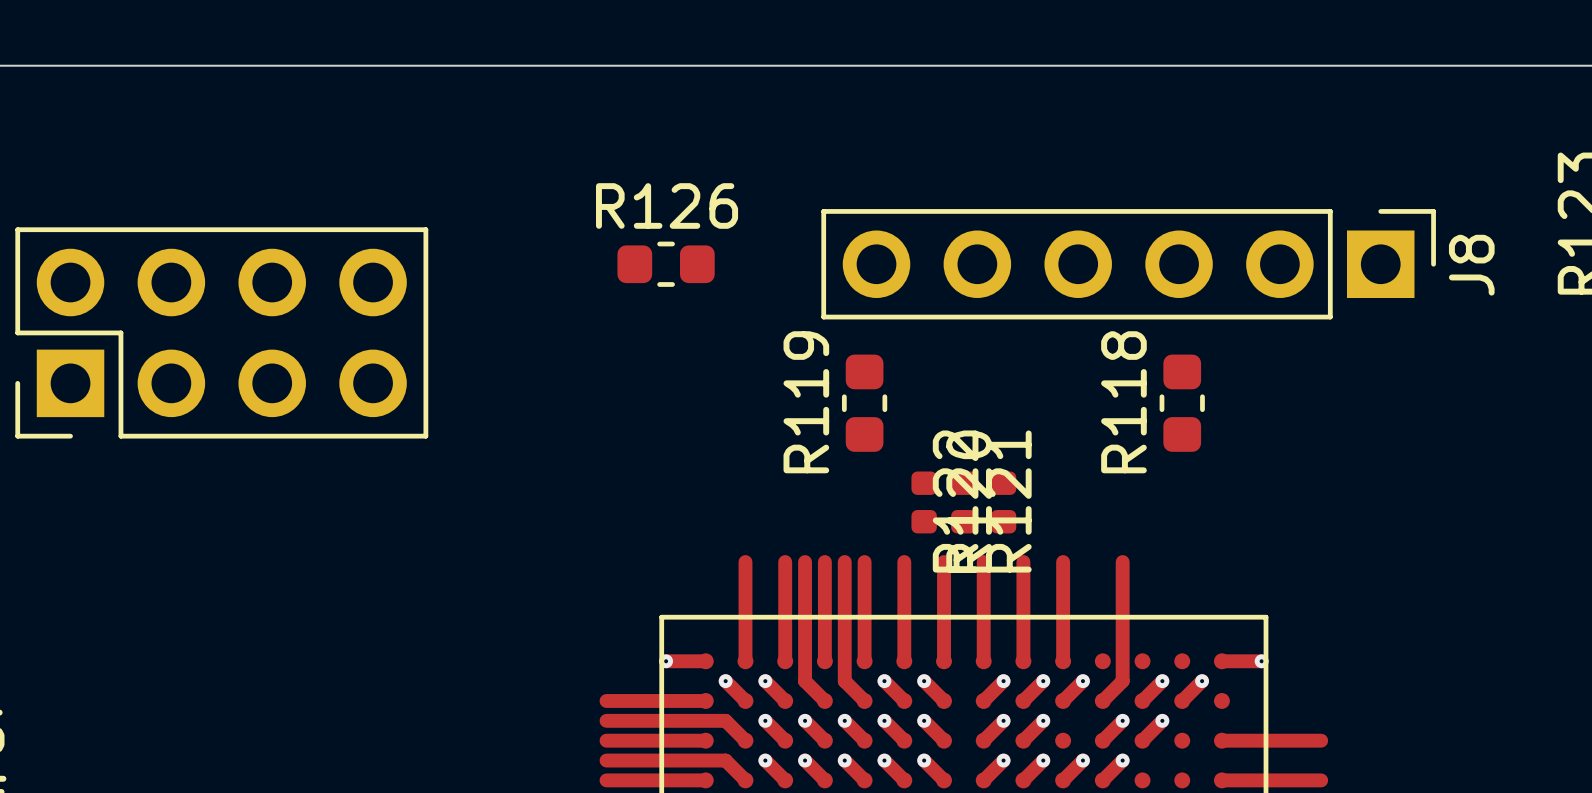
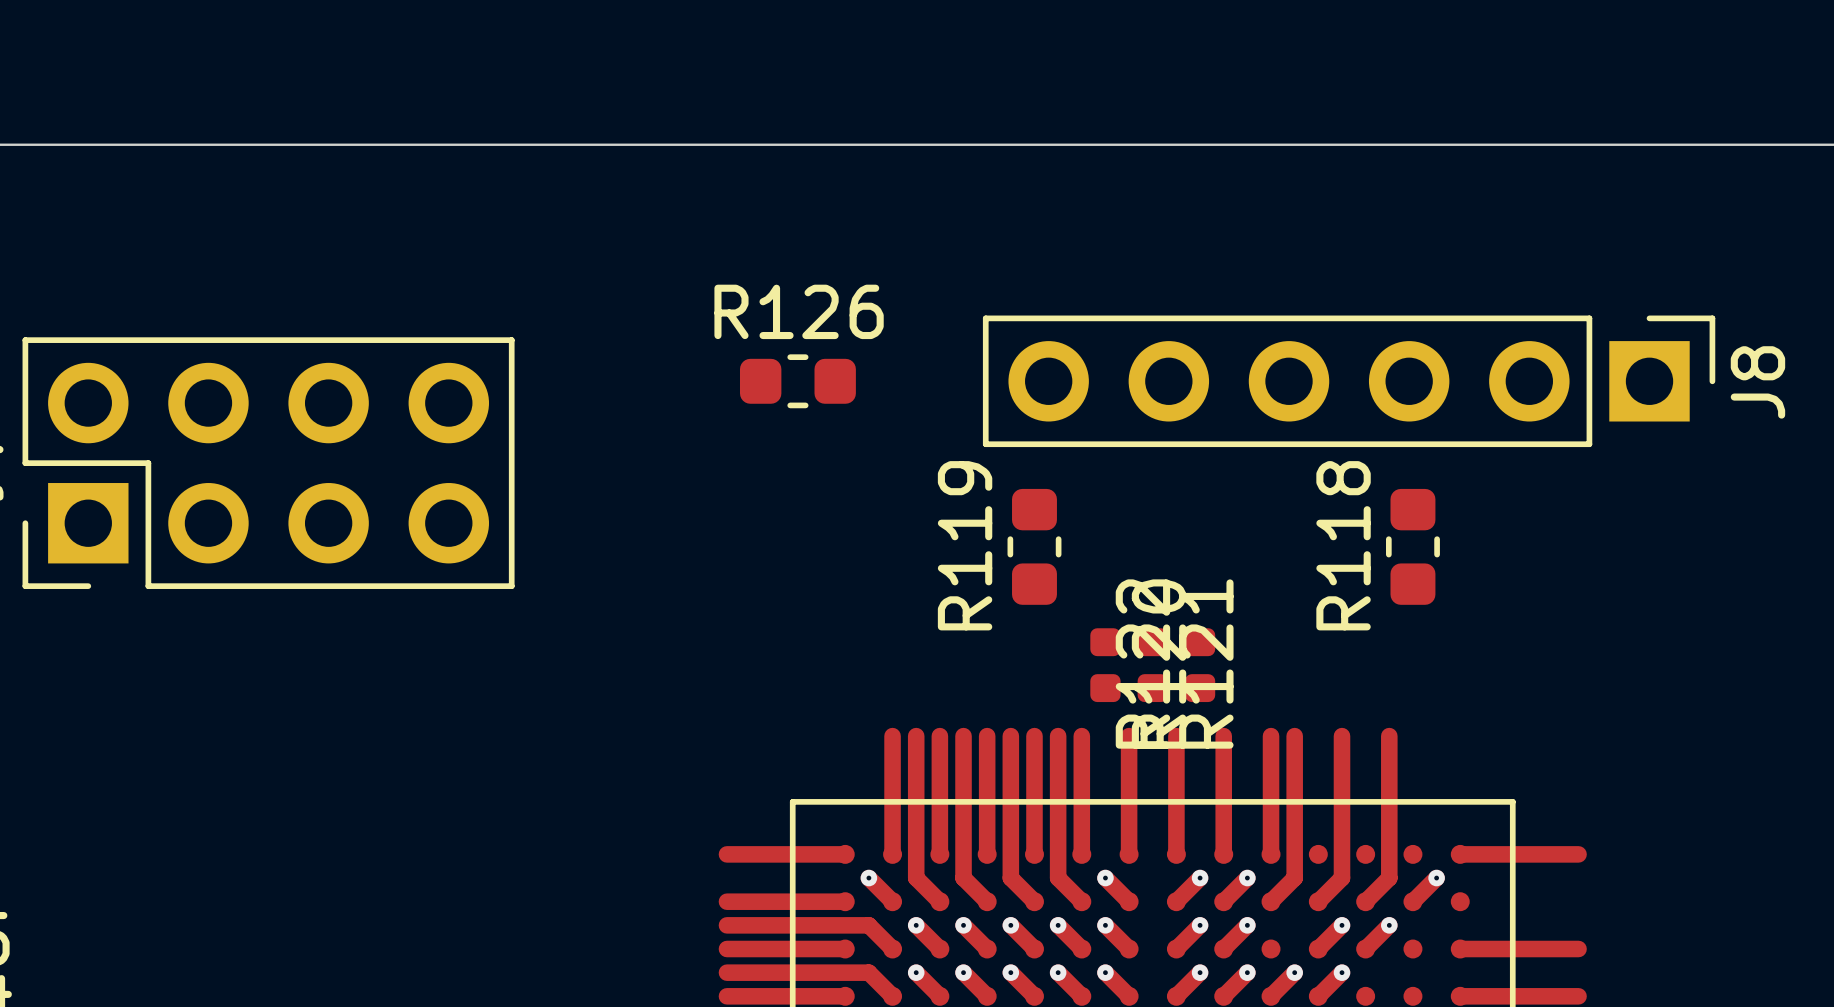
track: none -> (916, 736) (916, 878)
track: none -> (1058, 736) (1058, 878)
track: none -> (1294, 736) (1294, 878)
track: none -> (1389, 736) (1389, 878)
track: none -> (726, 854) (797, 854)
via: (666, 661) -> none
track: none -> (1507, 854) (1578, 854)
via: (1261, 661) -> none
via: (765, 681) -> none
via: (884, 681) -> none
via: (1082, 681) -> none
via: (1162, 681) -> none

